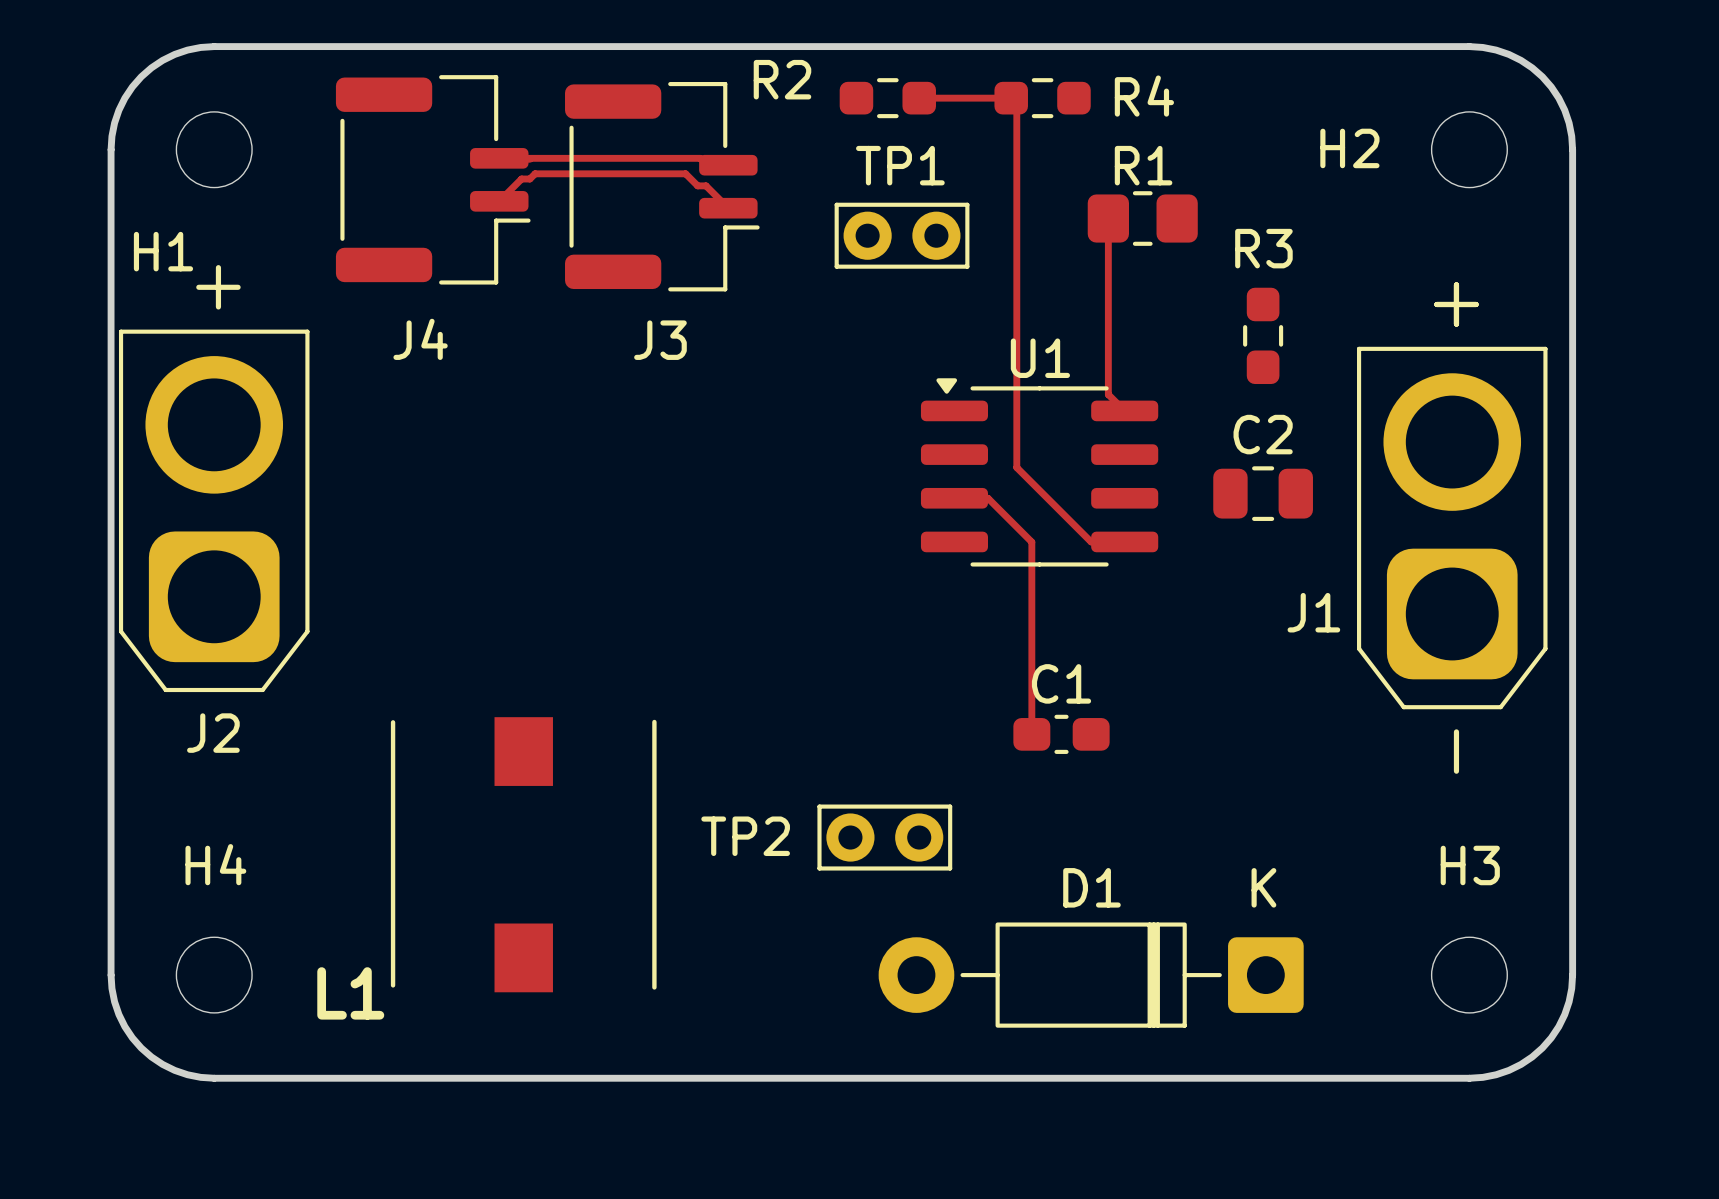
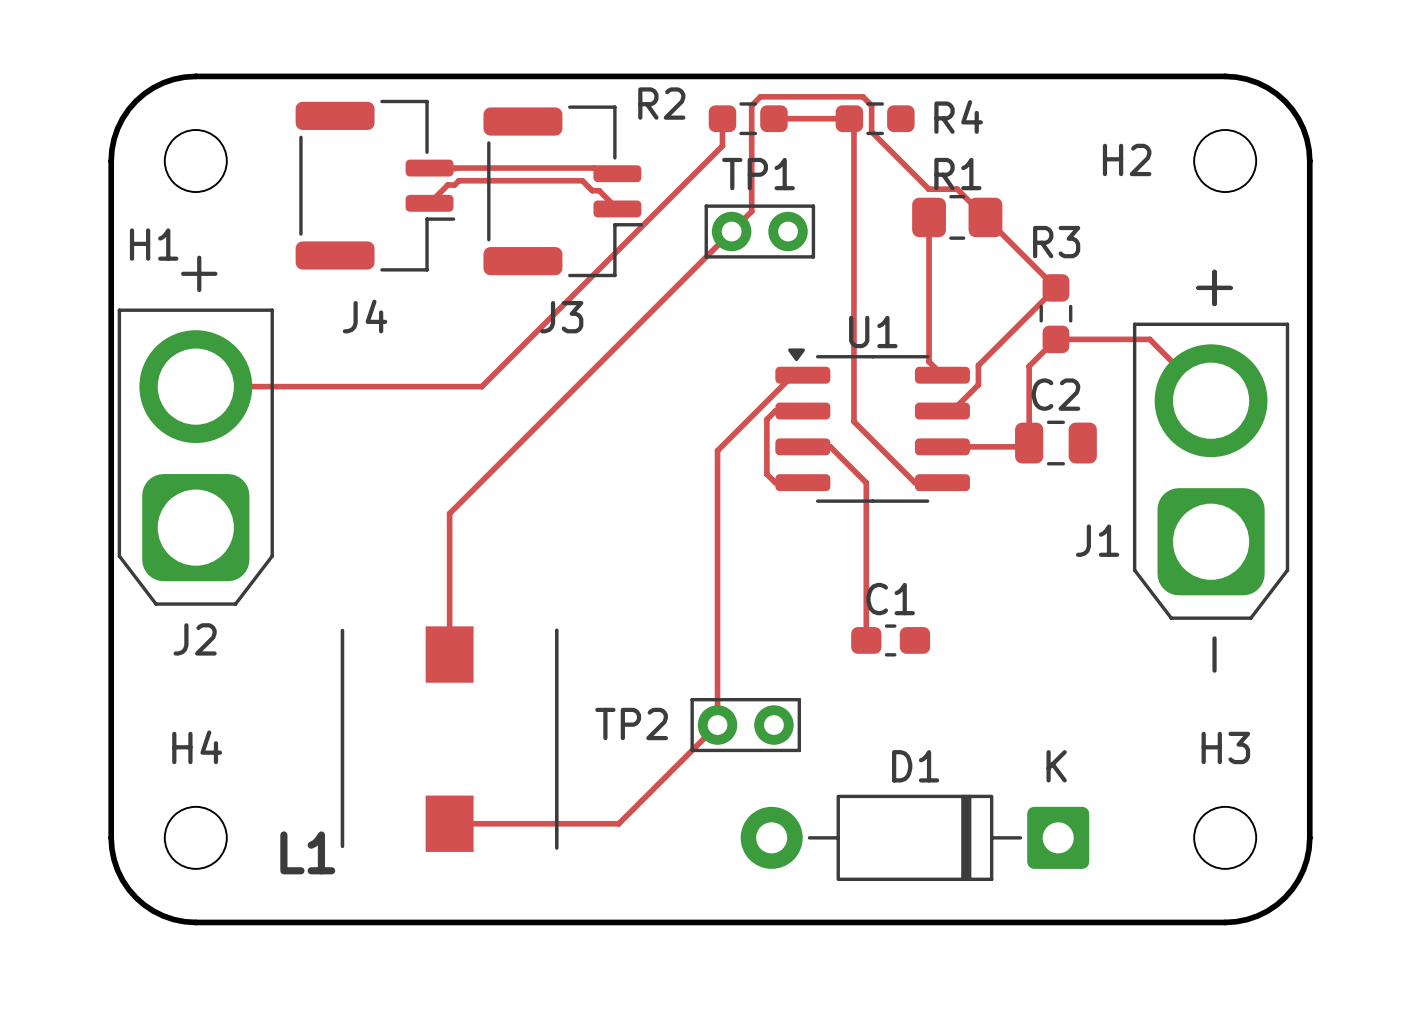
track: none -> (722, 118) (722, 145) (481, 386) (195, 386)
track: none -> (802, 375) (793, 375) (717, 450) (717, 725) (618, 823) (449, 823)
track: none -> (1211, 400) (1149, 339) (1055, 339) (1029, 366) (1029, 443) (1025, 446) (942, 446)
track: none -> (802, 411) (775, 411) (766, 419) (766, 474) (775, 482) (802, 482)
track: none -> (942, 411) (952, 411) (978, 384) (978, 365) (1055, 287) (957, 189) (928, 189) (871, 131) (871, 105) (862, 96) (760, 96) (751, 105) (751, 211) (449, 513) (449, 654)

